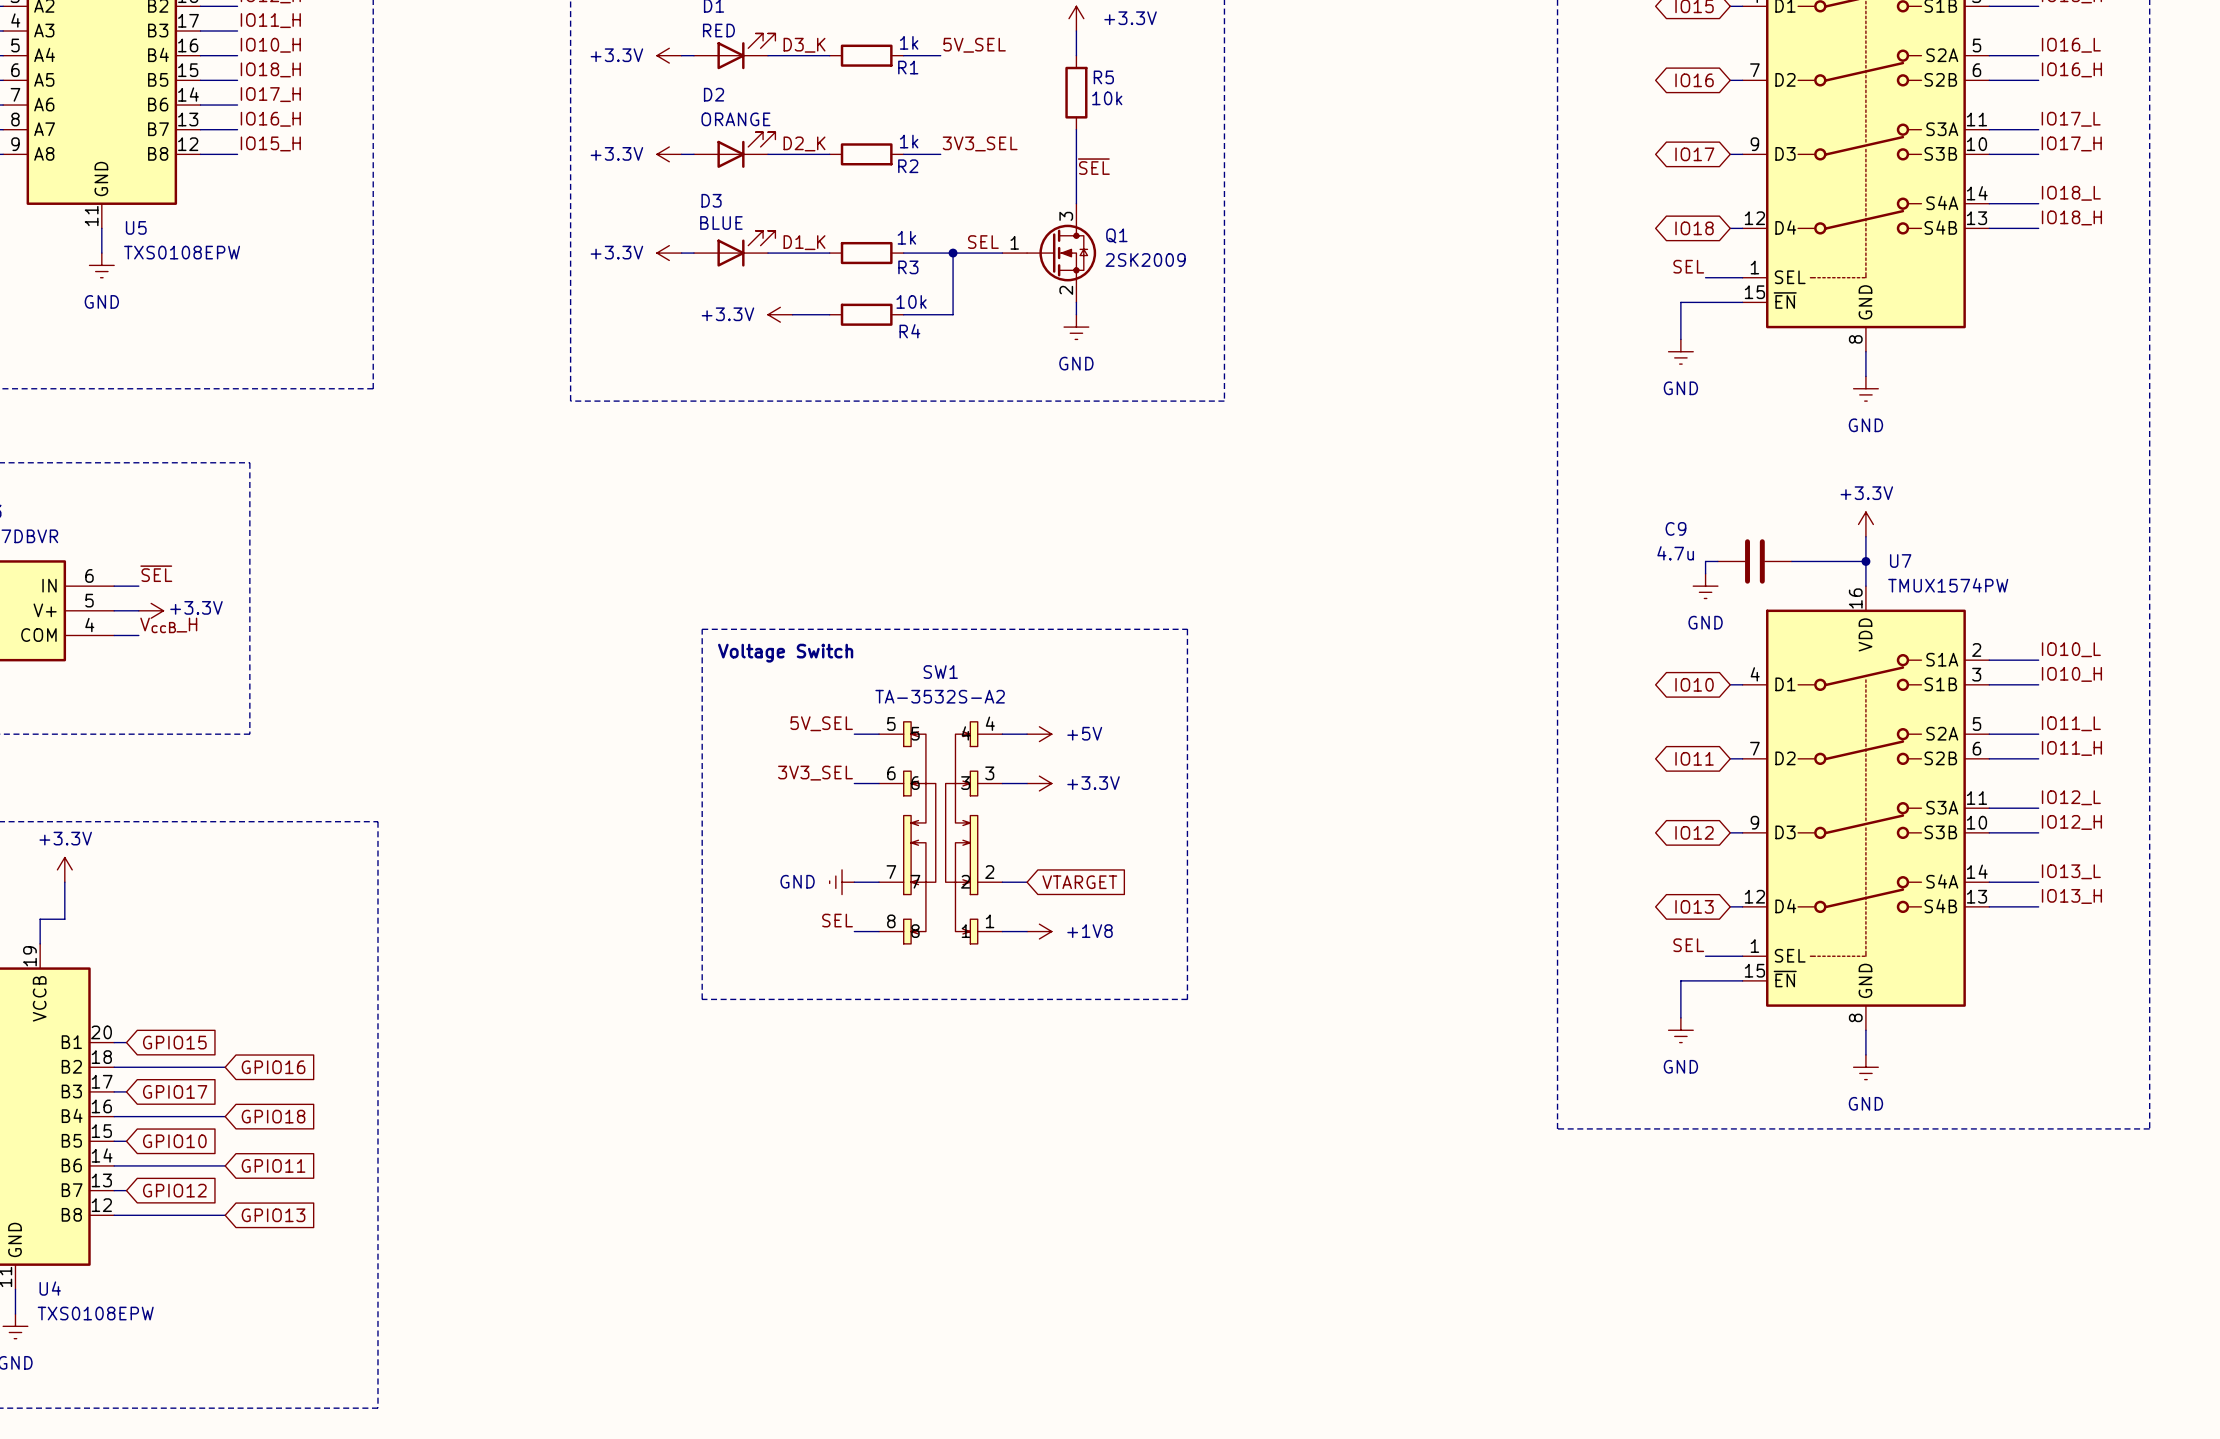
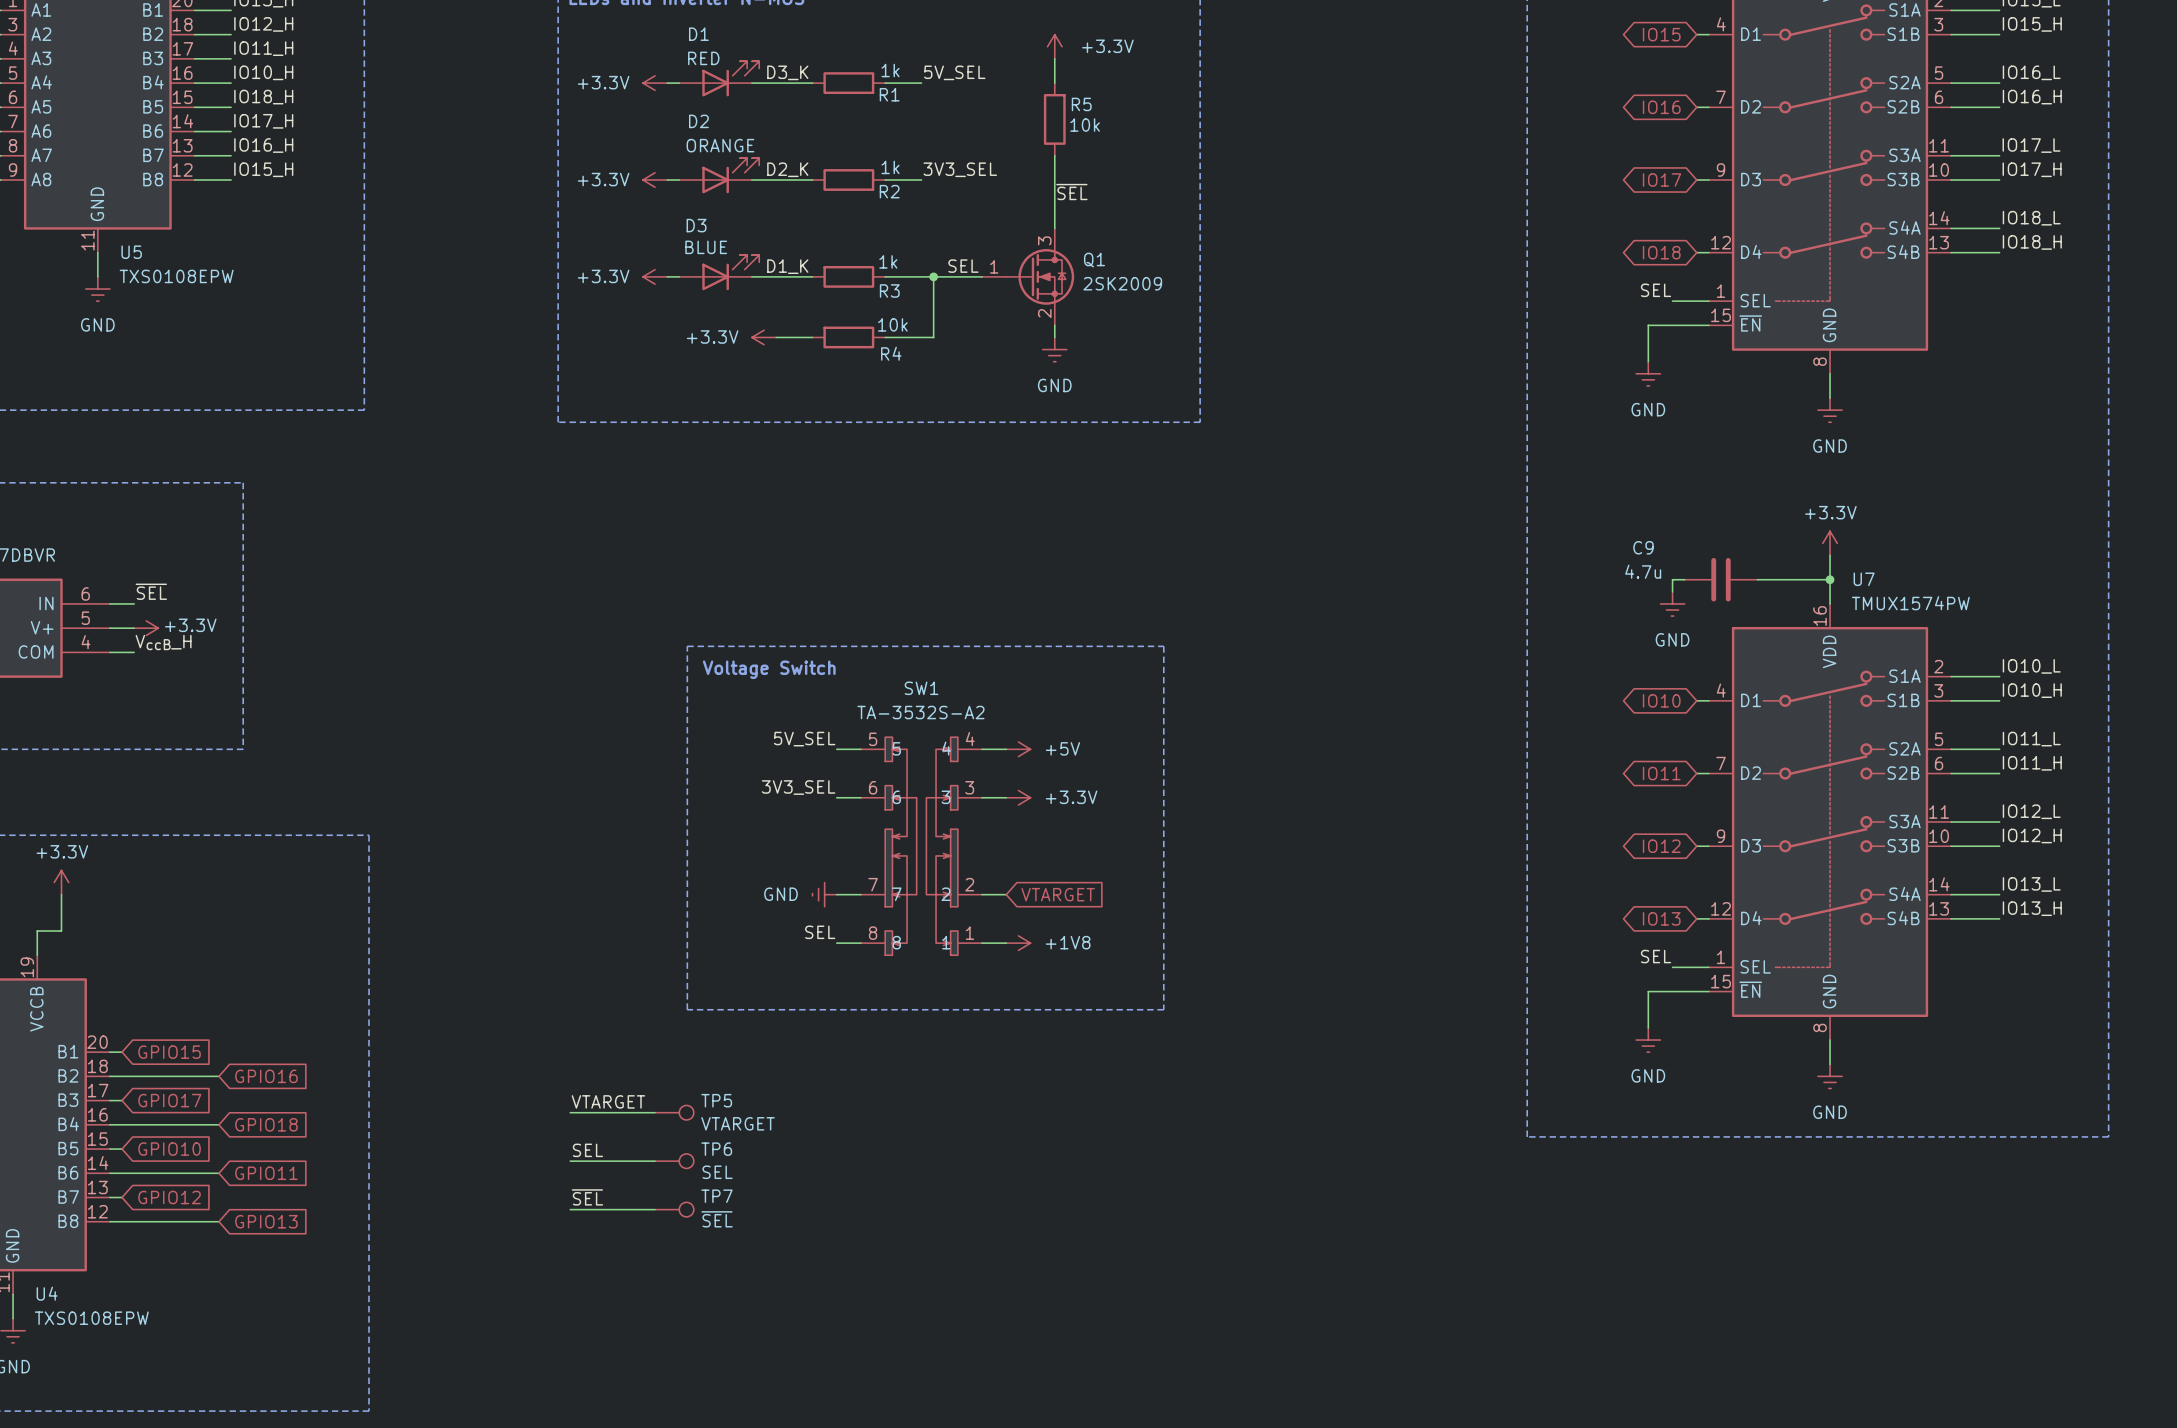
label: none -> VTARGET (608, 1101)
wire: none -> (570, 1112) (655, 1112)
TP5: none -> VTARGET (674, 1112)
label: none -> SEL (587, 1150)
wire: none -> (570, 1161) (655, 1161)
TP6: none -> SEL (674, 1161)
label: none -> ~{SEL} (587, 1197)
wire: none -> (570, 1209) (655, 1209)
TP7: none -> ~{SEL} (674, 1209)

